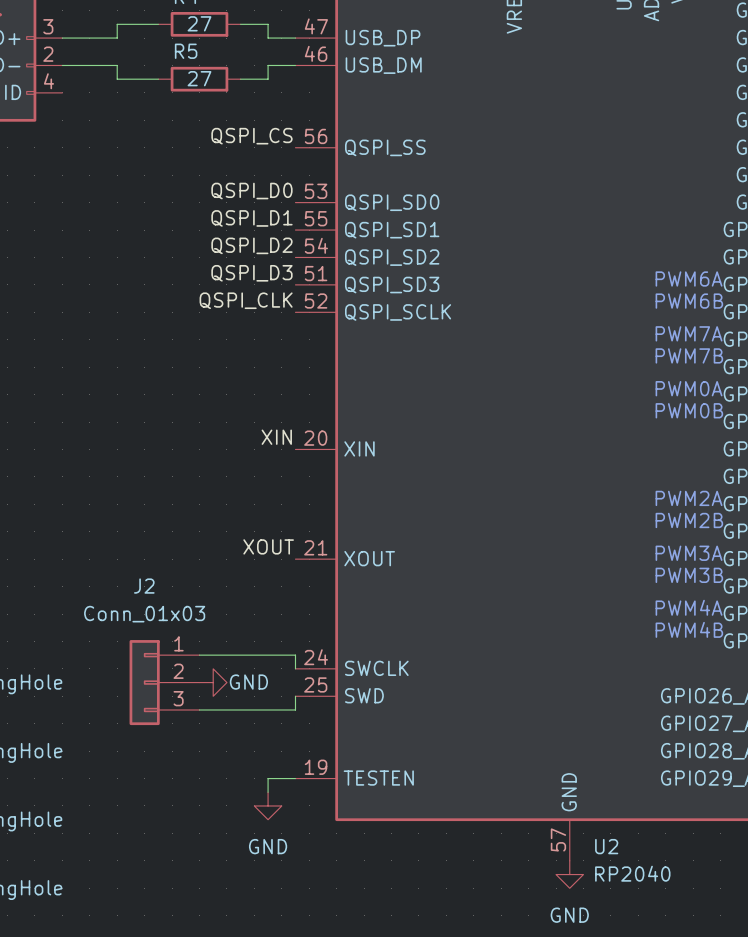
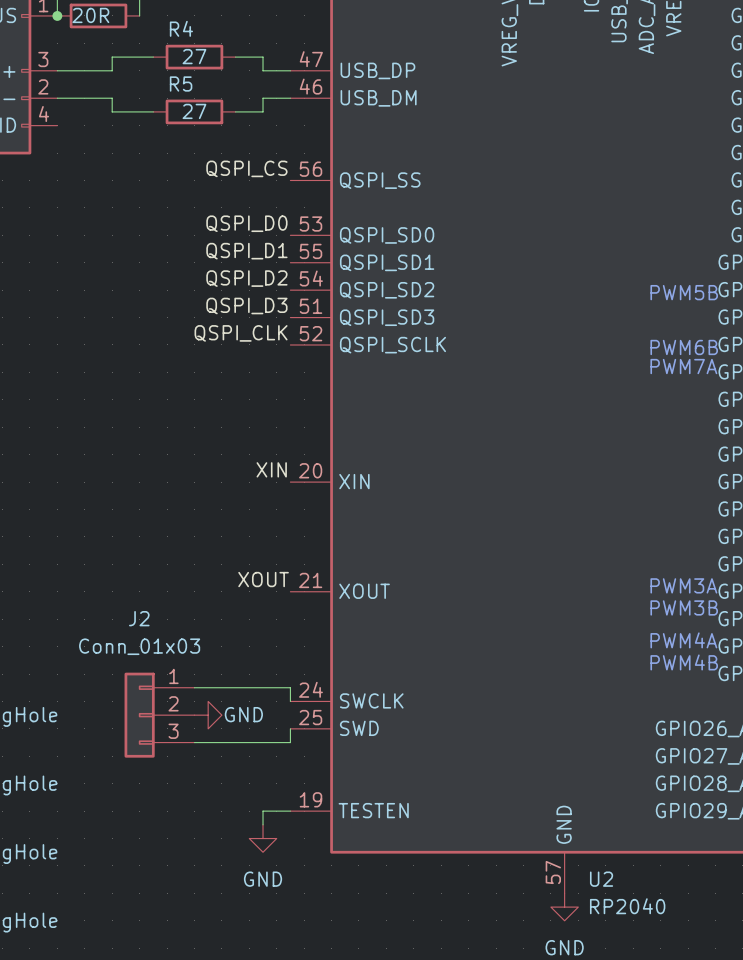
text: none -> PWM5B (684, 292)
text: PWM6A (689, 279) -> none
text position: PWM6B (689, 301) -> PWM6B (684, 347)
text: PWM7B (689, 355) -> none
text: PWM0A (689, 388) -> none
text: PWM0B (689, 410) -> none
text: PWM2A (689, 498) -> none
text: PWM2B (689, 520) -> none

